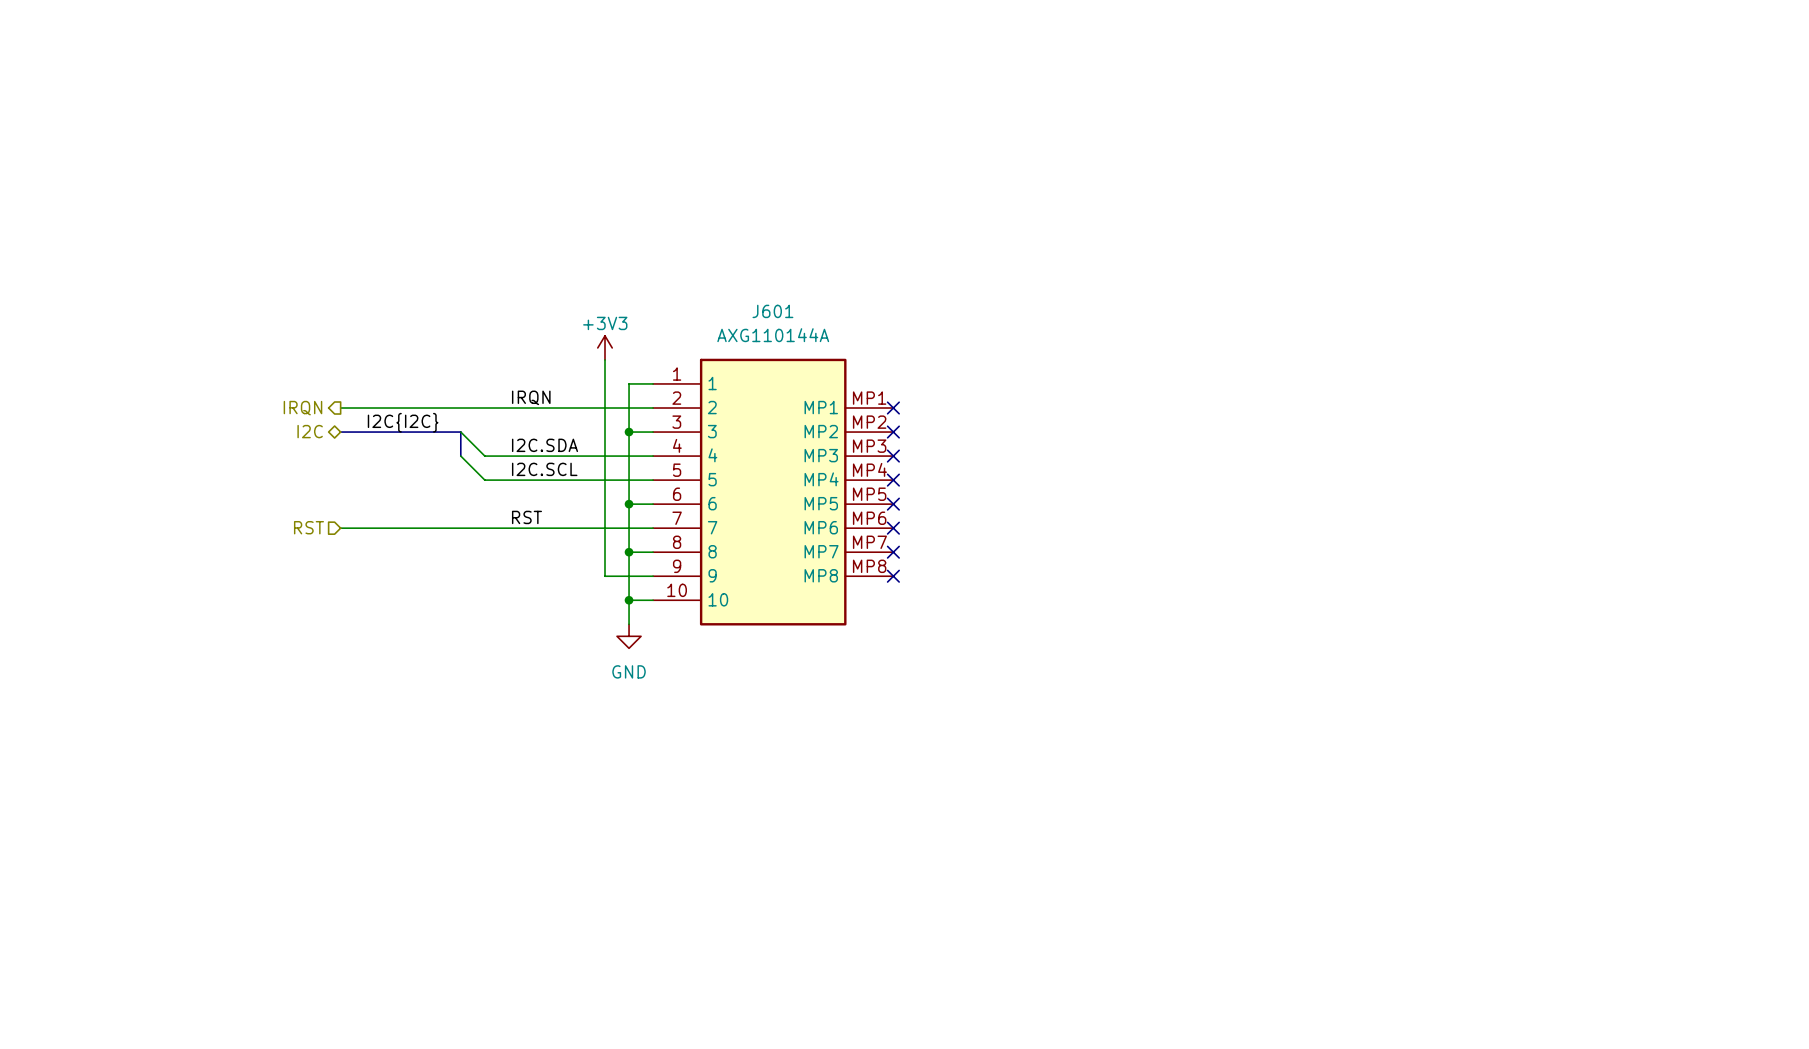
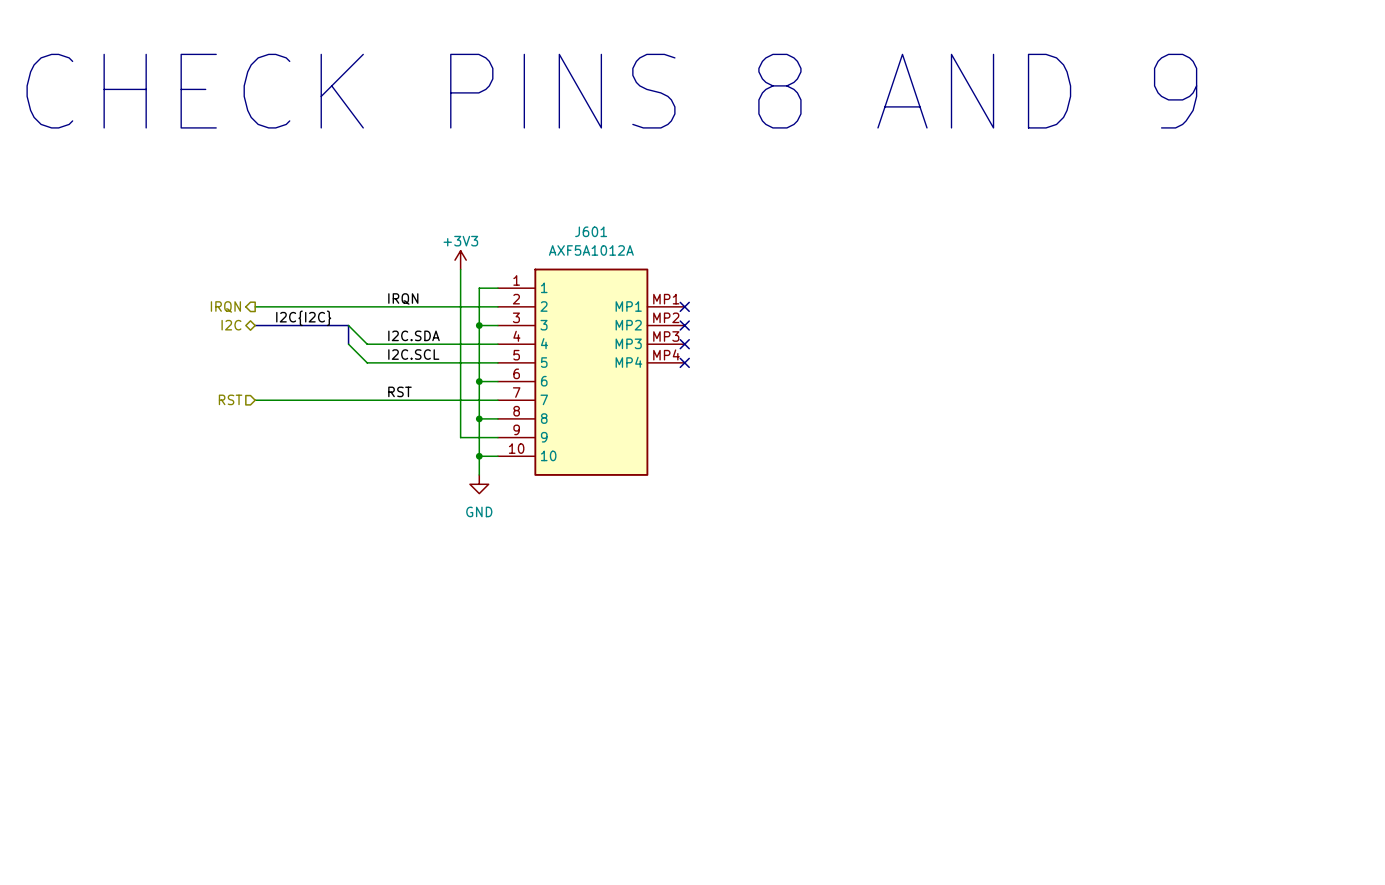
text: none -> CHECK PINS 8 AND 9 (611, 91)
J601 value: AXG110144A (773, 335) -> AXF5A1012A (591, 250)
J601 symbol: [653, 358, 894, 626] -> [497, 268, 685, 476]
no-connect mark: (893, 504) -> none
no-connect mark: (893, 528) -> none
no-connect mark: (893, 552) -> none
no-connect mark: (893, 576) -> none

